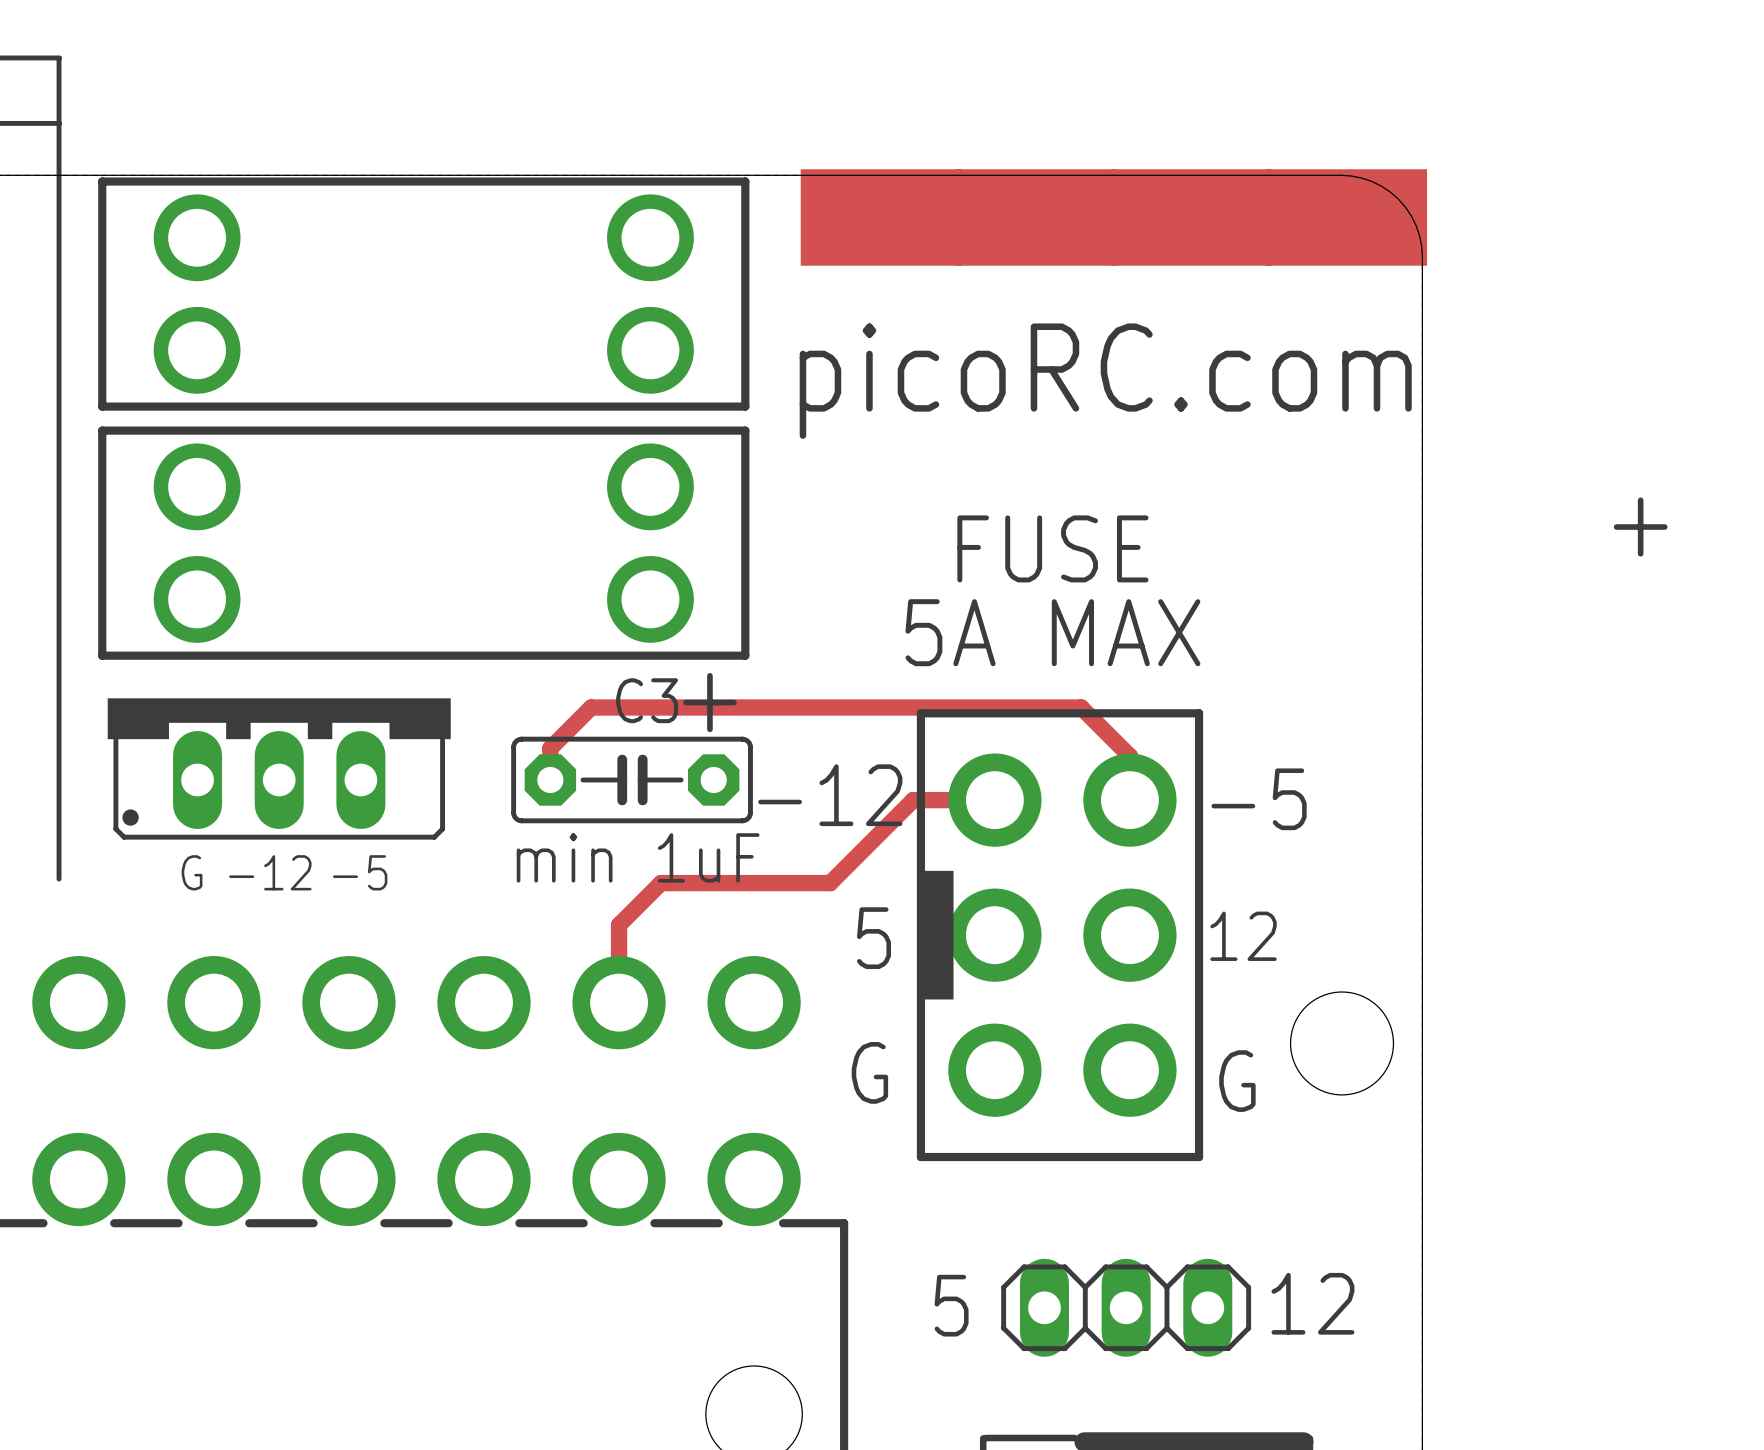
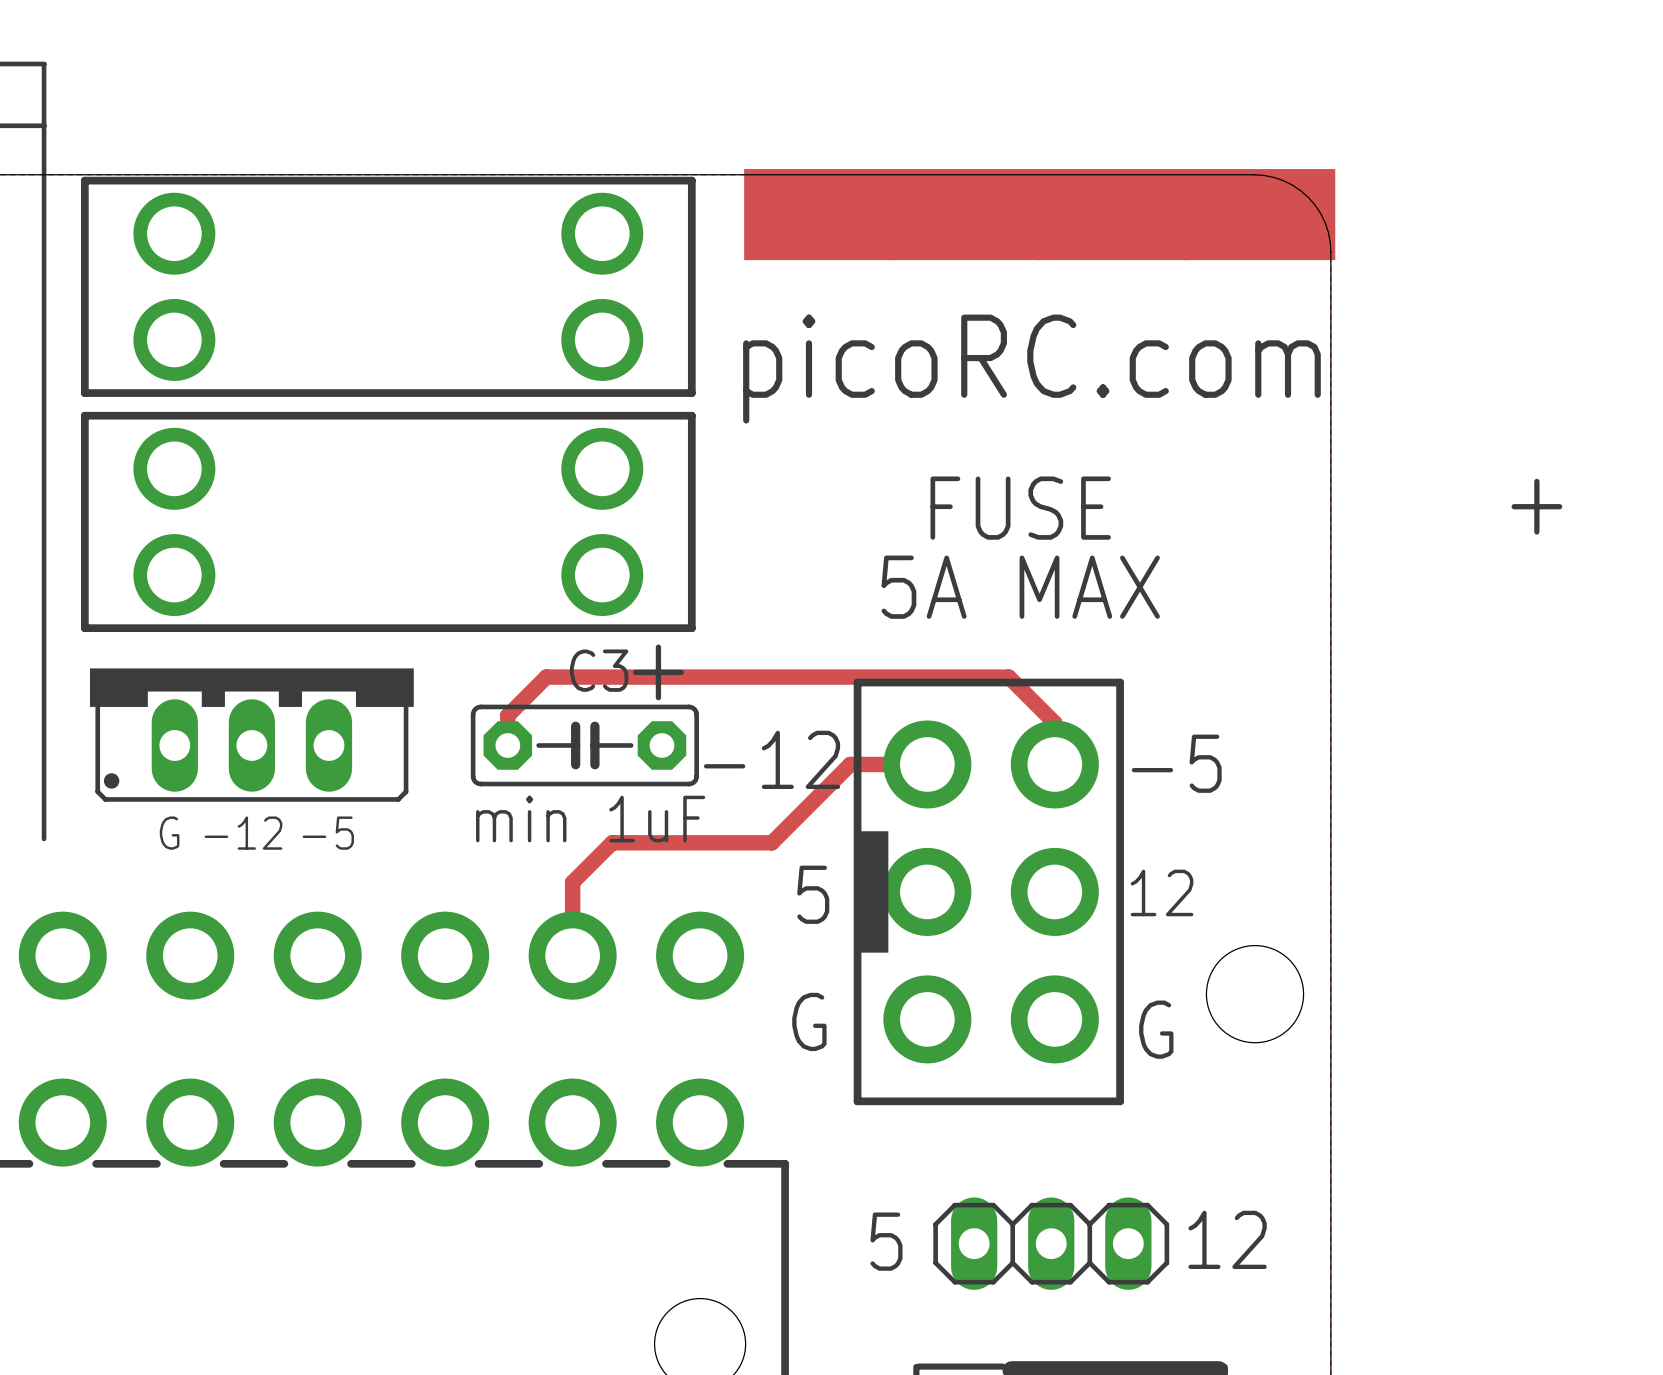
text position: FUSE (1052, 548) -> FUSE (1020, 508)
text position: 5A MAX (1052, 632) -> 5A MAX (1020, 587)

